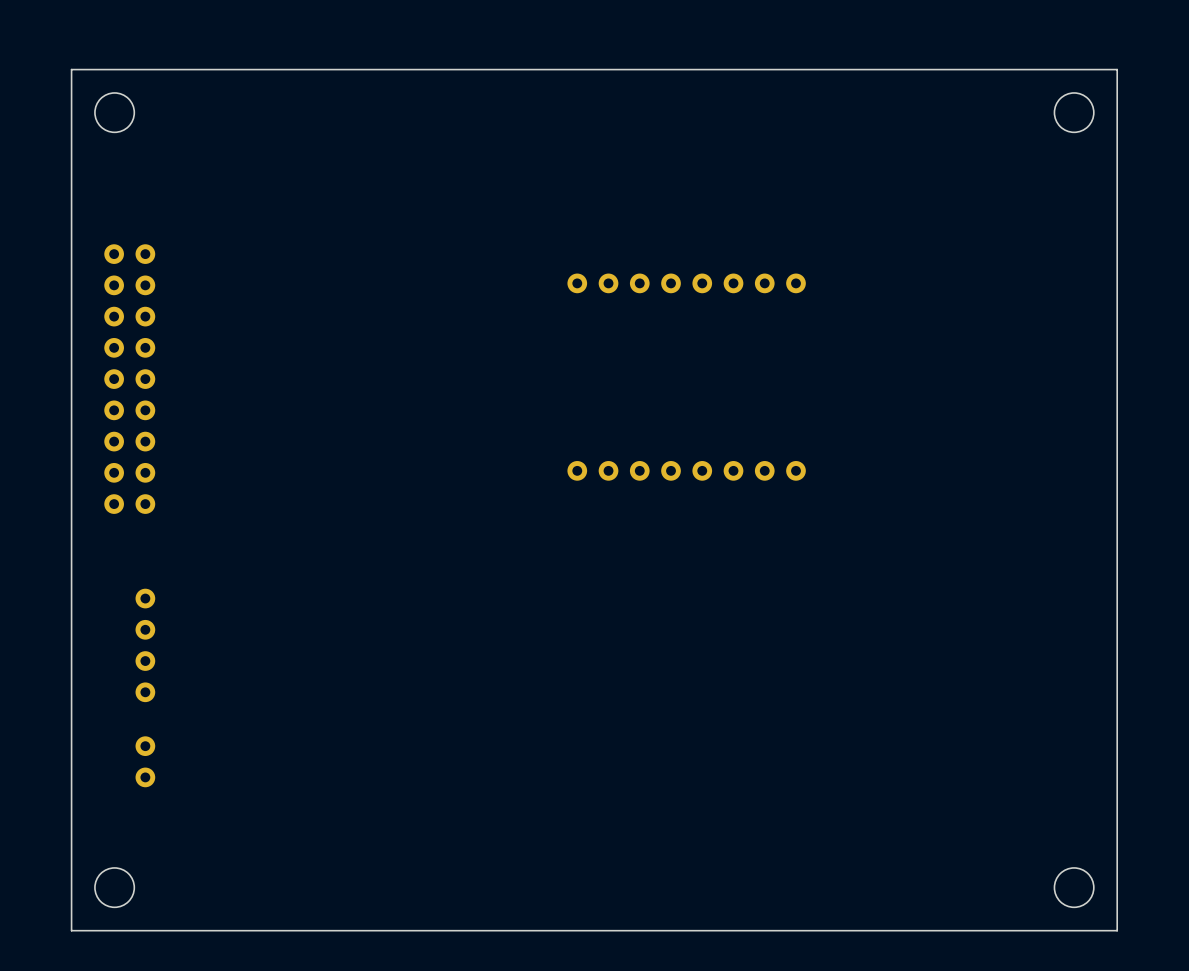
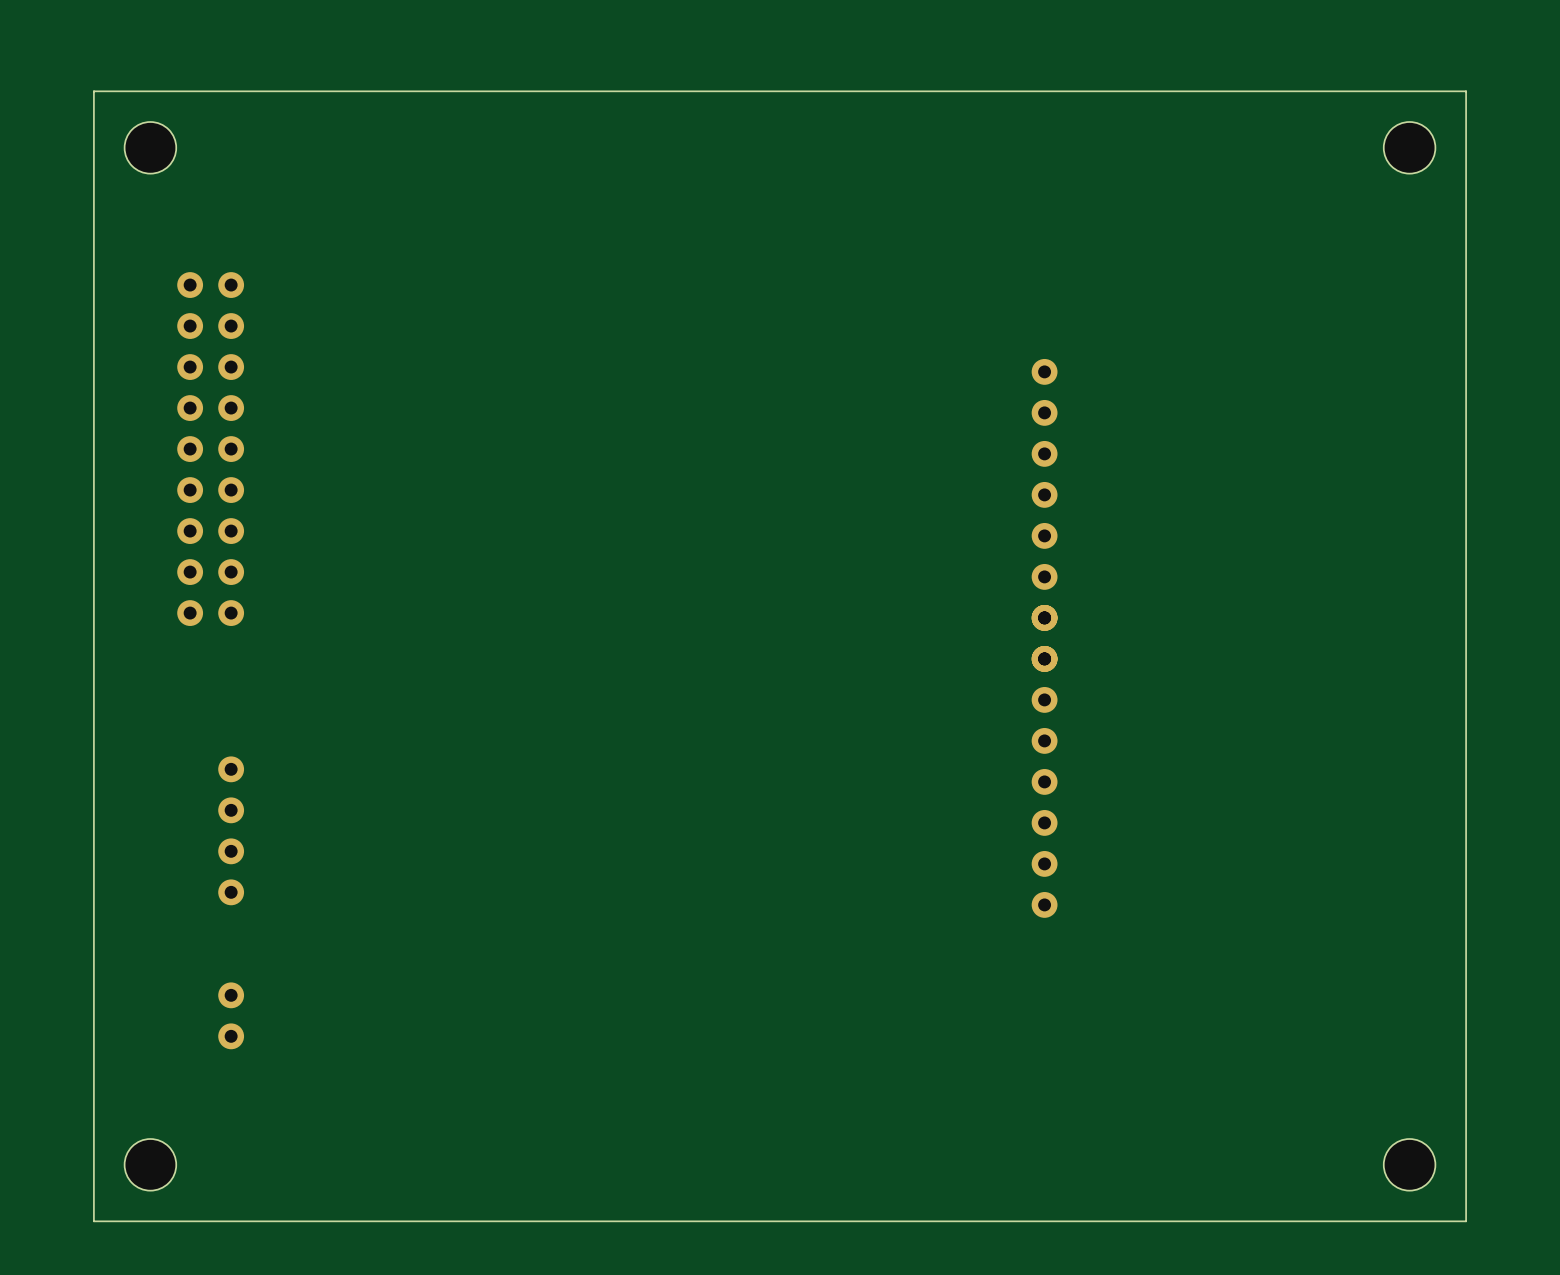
part: (686, 283) -> none
part position: (129, 379) -> (210, 449)
part: none -> (1044, 515)
part: (686, 470) -> none
part: none -> (1044, 761)
part position: (145, 645) -> (231, 830)
part position: (145, 761) -> (231, 1015)

